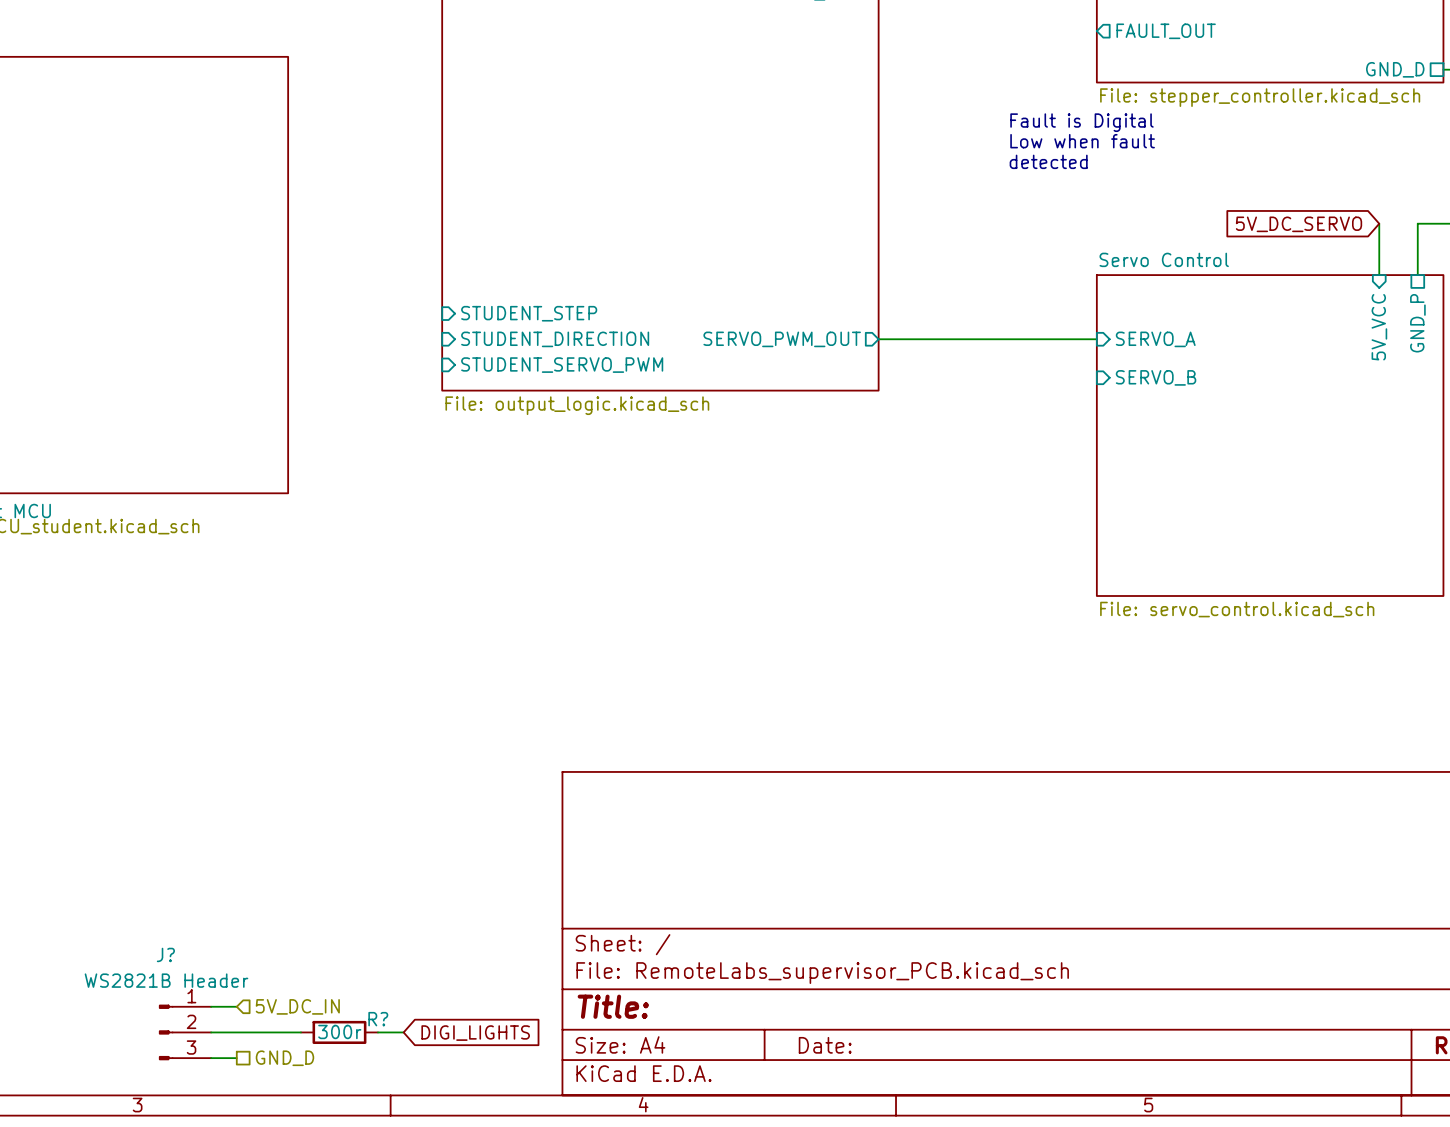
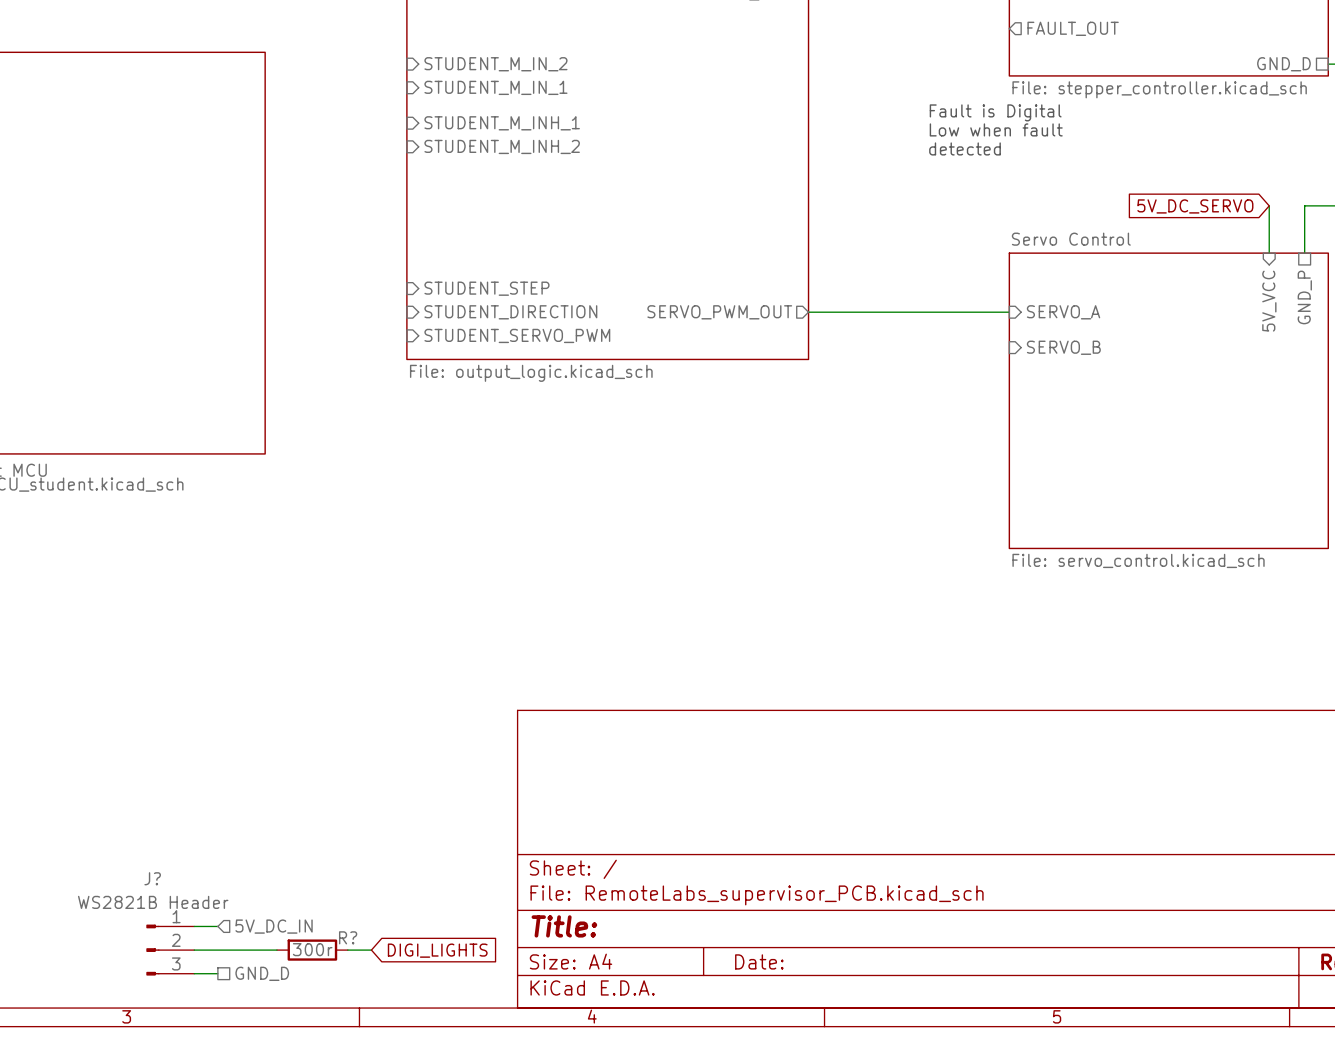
sheet pin: none -> STUDENT_M_IN_2 (495, 64)
sheet pin: none -> STUDENT_M_IN_1 (495, 87)
sheet pin: none -> STUDENT_M_INH_1 (502, 123)
sheet pin: none -> STUDENT_M_INH_2 (502, 146)

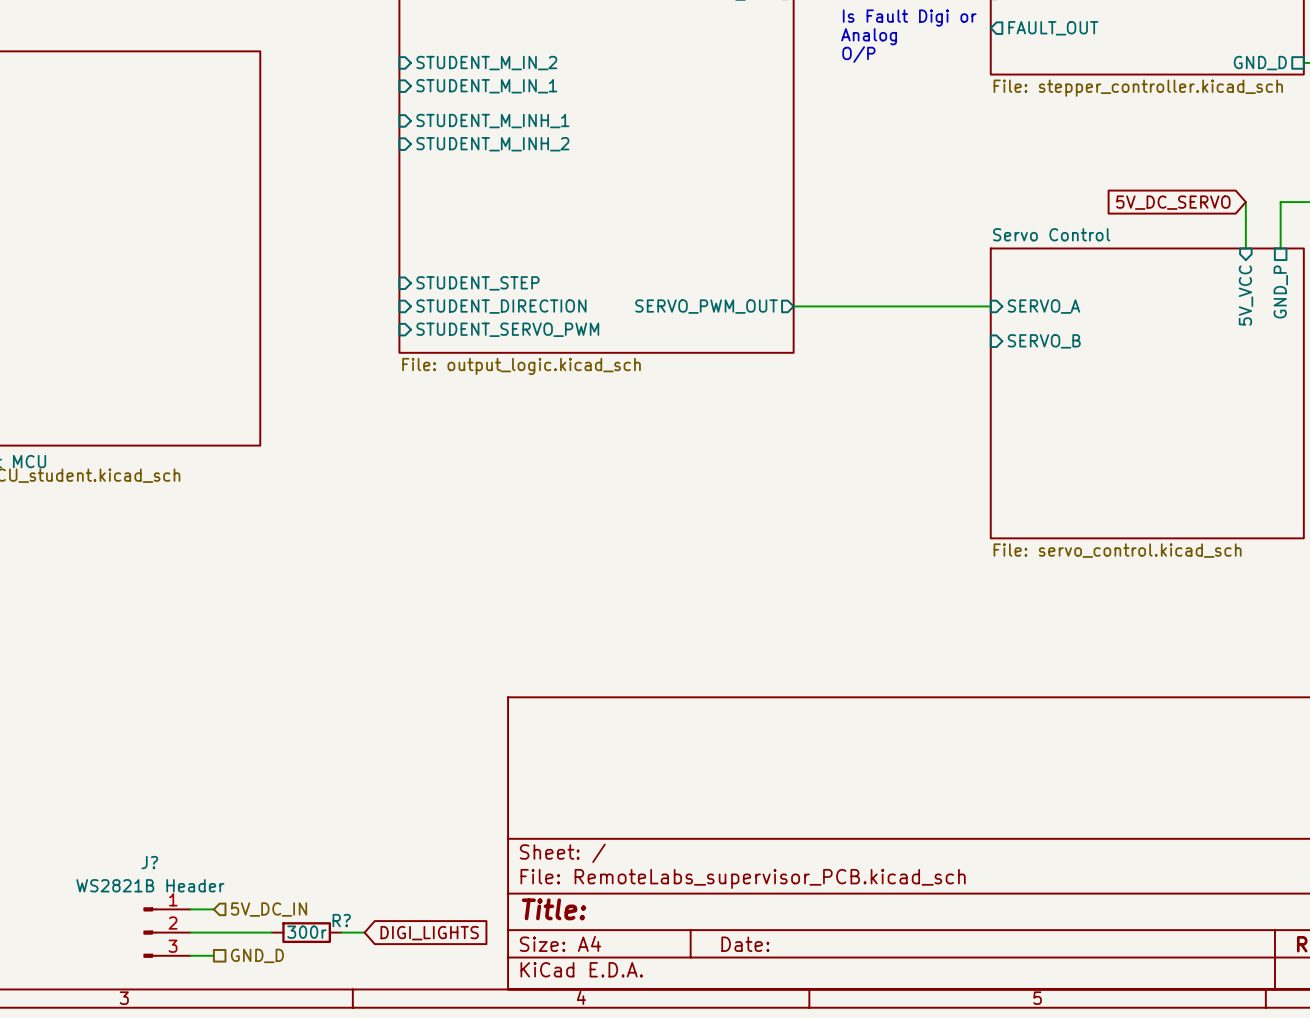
text: none -> Is Fault Digi or (909, 18)
text: none -> Analog (869, 36)
text: none -> O/P (858, 54)
text: Fault is Digital (995, 112) -> none
text: Low when fault (996, 129) -> none
text: detected (965, 148) -> none

